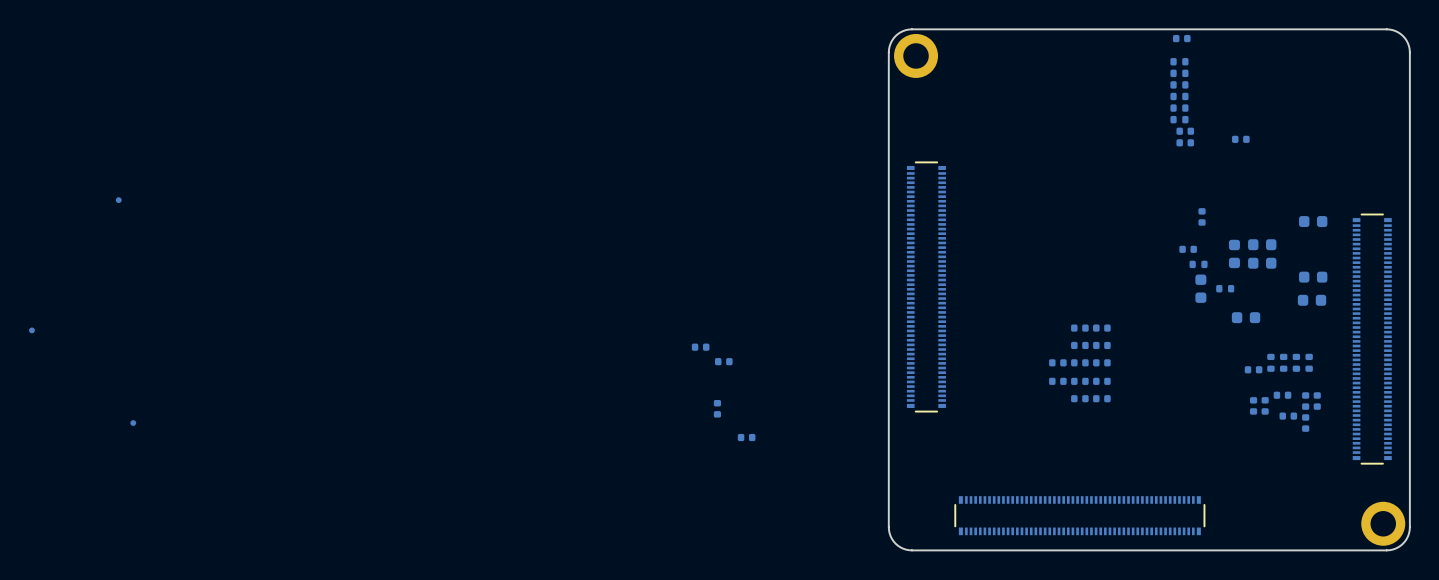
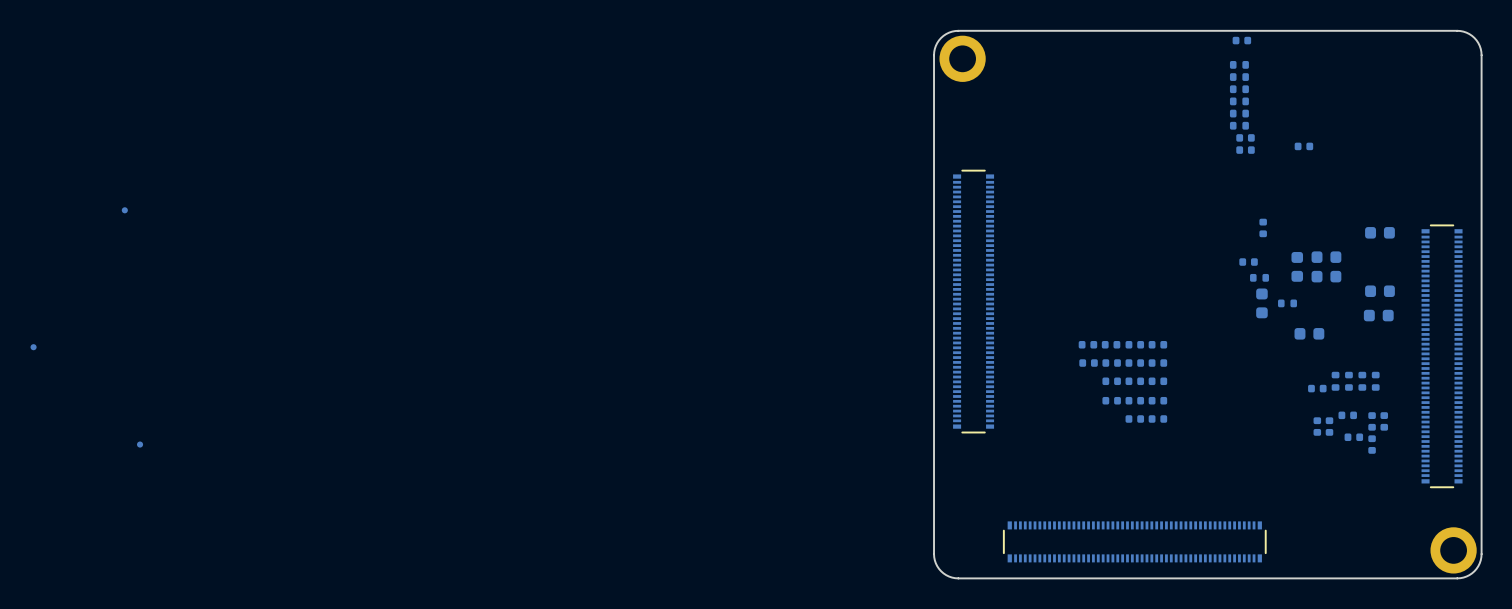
part: none -> (1087, 344)
part: none -> (1111, 344)
part: none -> (1088, 363)
part: none -> (1111, 363)
part: (700, 347) -> none
part: (723, 361) -> none
part: (717, 408) -> none
part: (746, 437) -> none

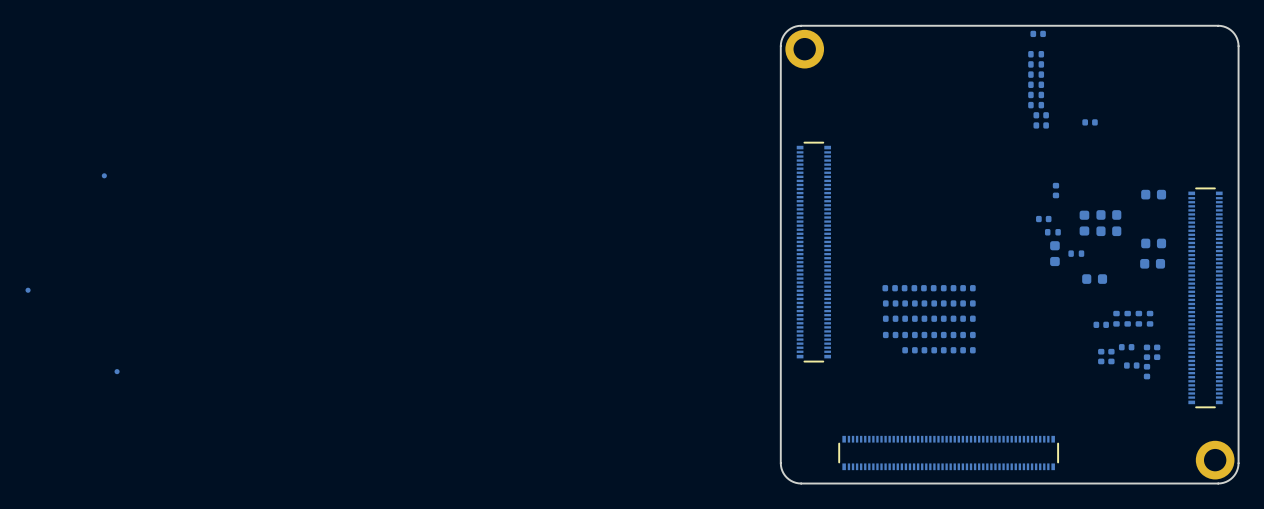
part: none -> (890, 288)
part: none -> (890, 303)
part: none -> (890, 318)
part: none -> (909, 318)
part: none -> (890, 335)
part: none -> (909, 335)
part: none -> (909, 350)
part: none -> (929, 350)

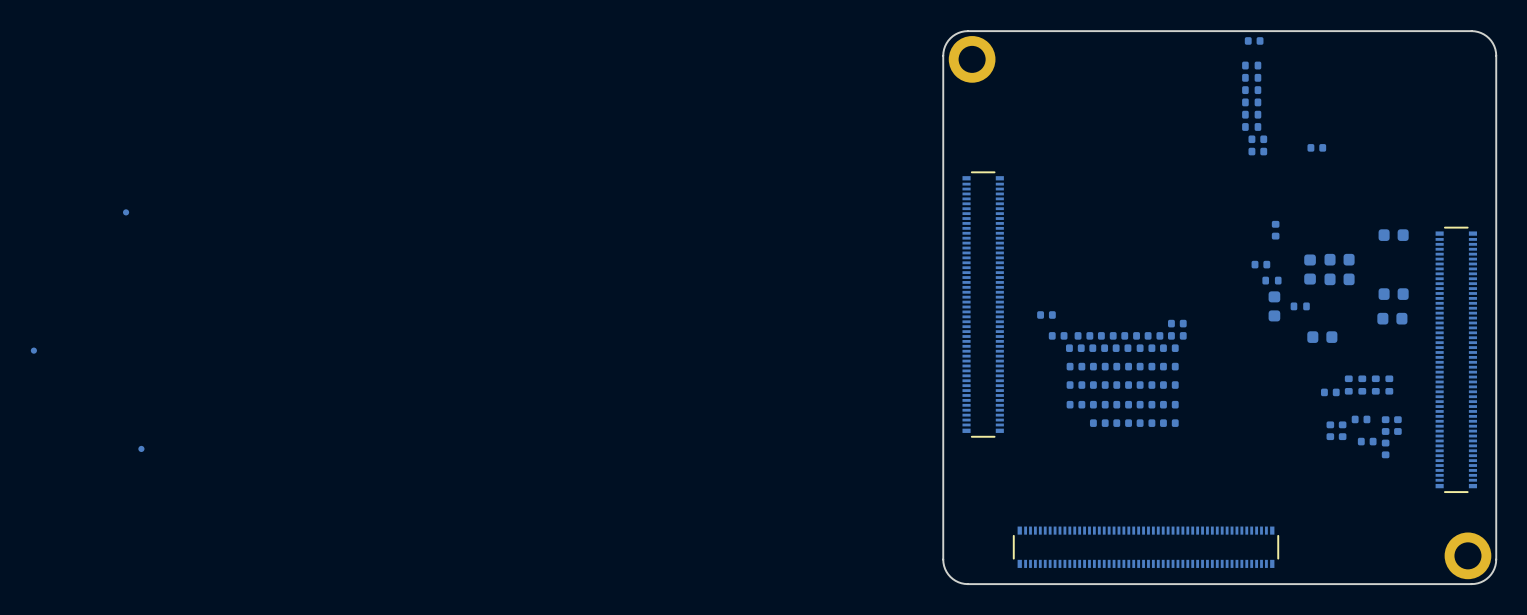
part: none -> (1046, 314)
part: none -> (1177, 323)
part: none -> (1058, 335)
part: none -> (1083, 335)
part: none -> (1107, 335)
part: none -> (1130, 335)
part: none -> (1153, 335)
part: none -> (1177, 335)

